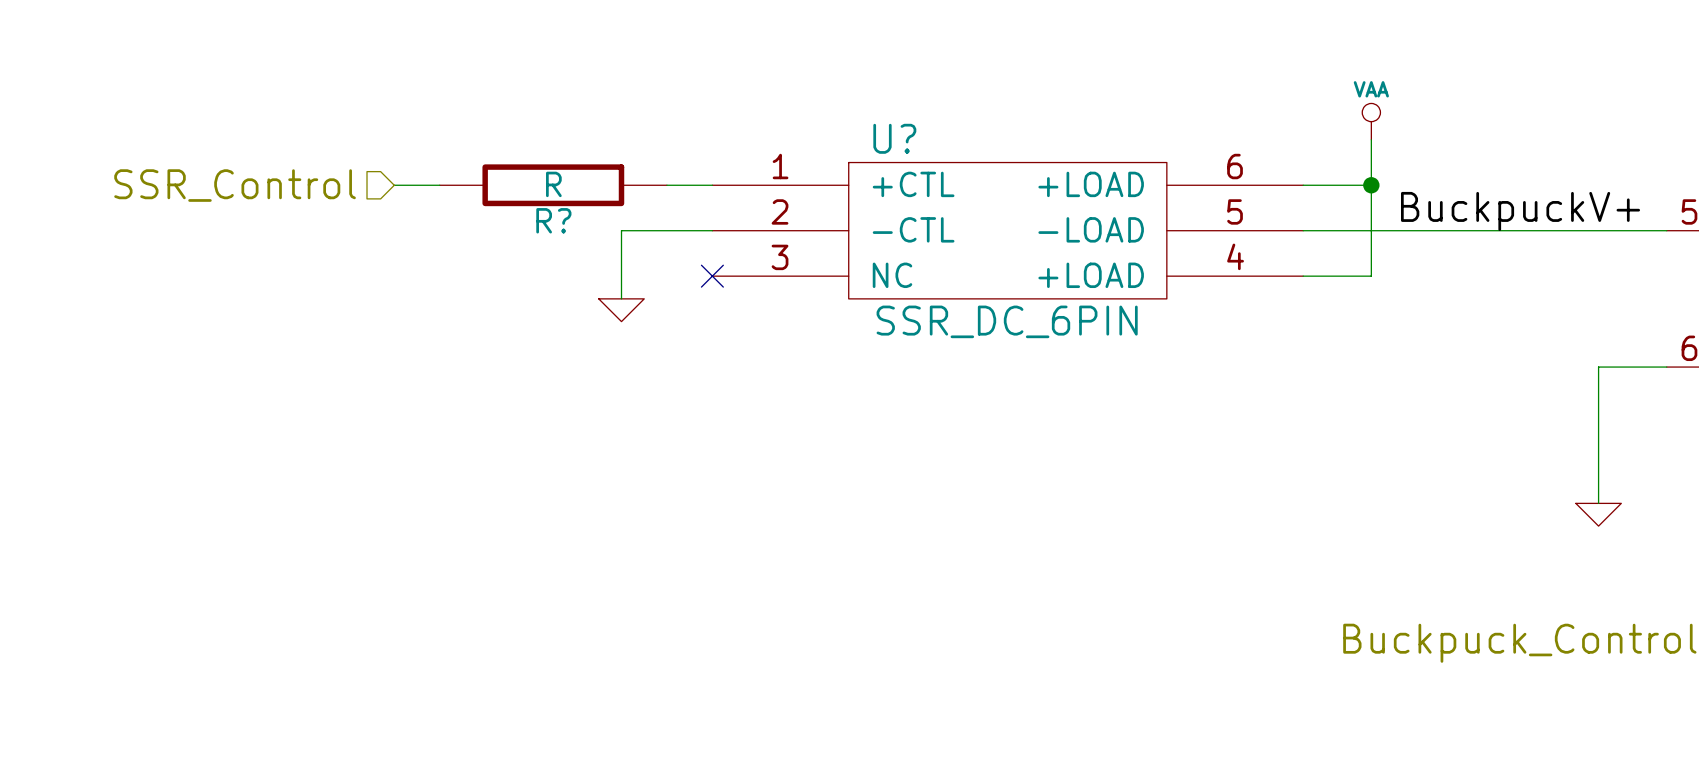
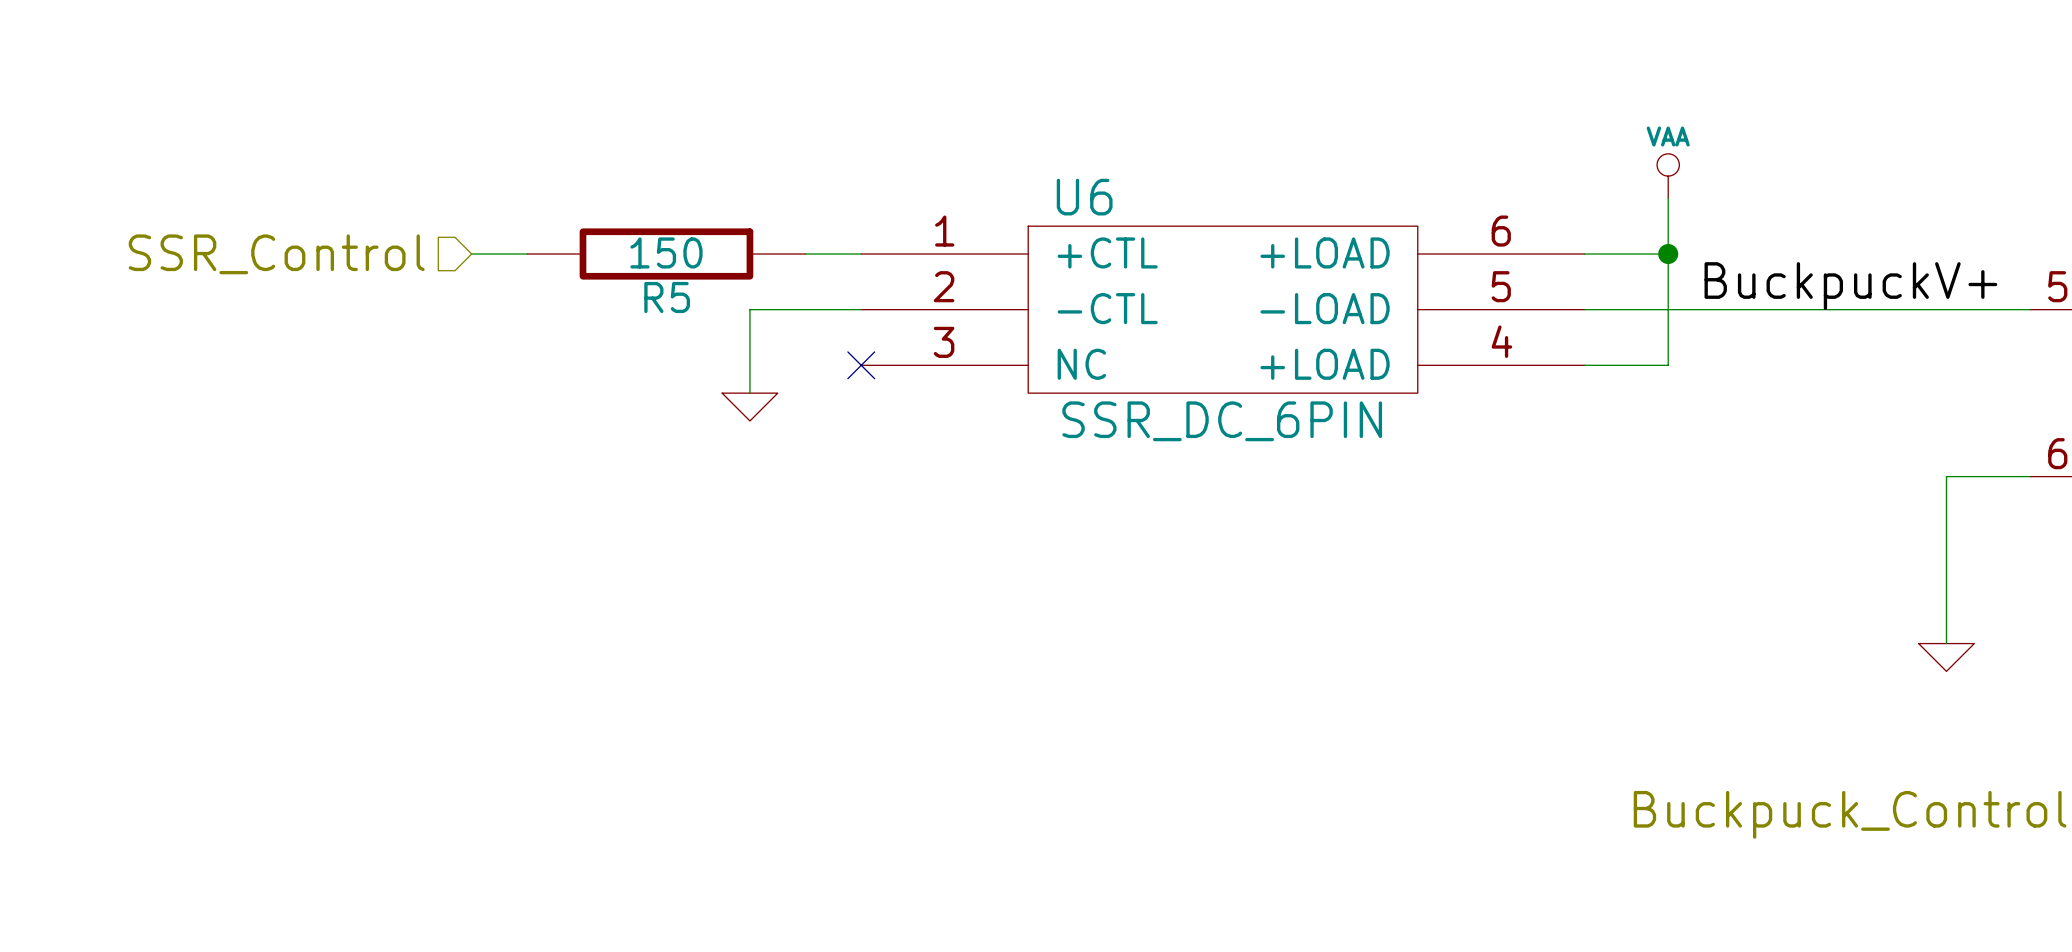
U? name: U? (894, 138) -> U6 (1084, 197)
R? value: R (553, 184) -> 150 (666, 252)
R? name: R? (553, 220) -> R5 (667, 297)

